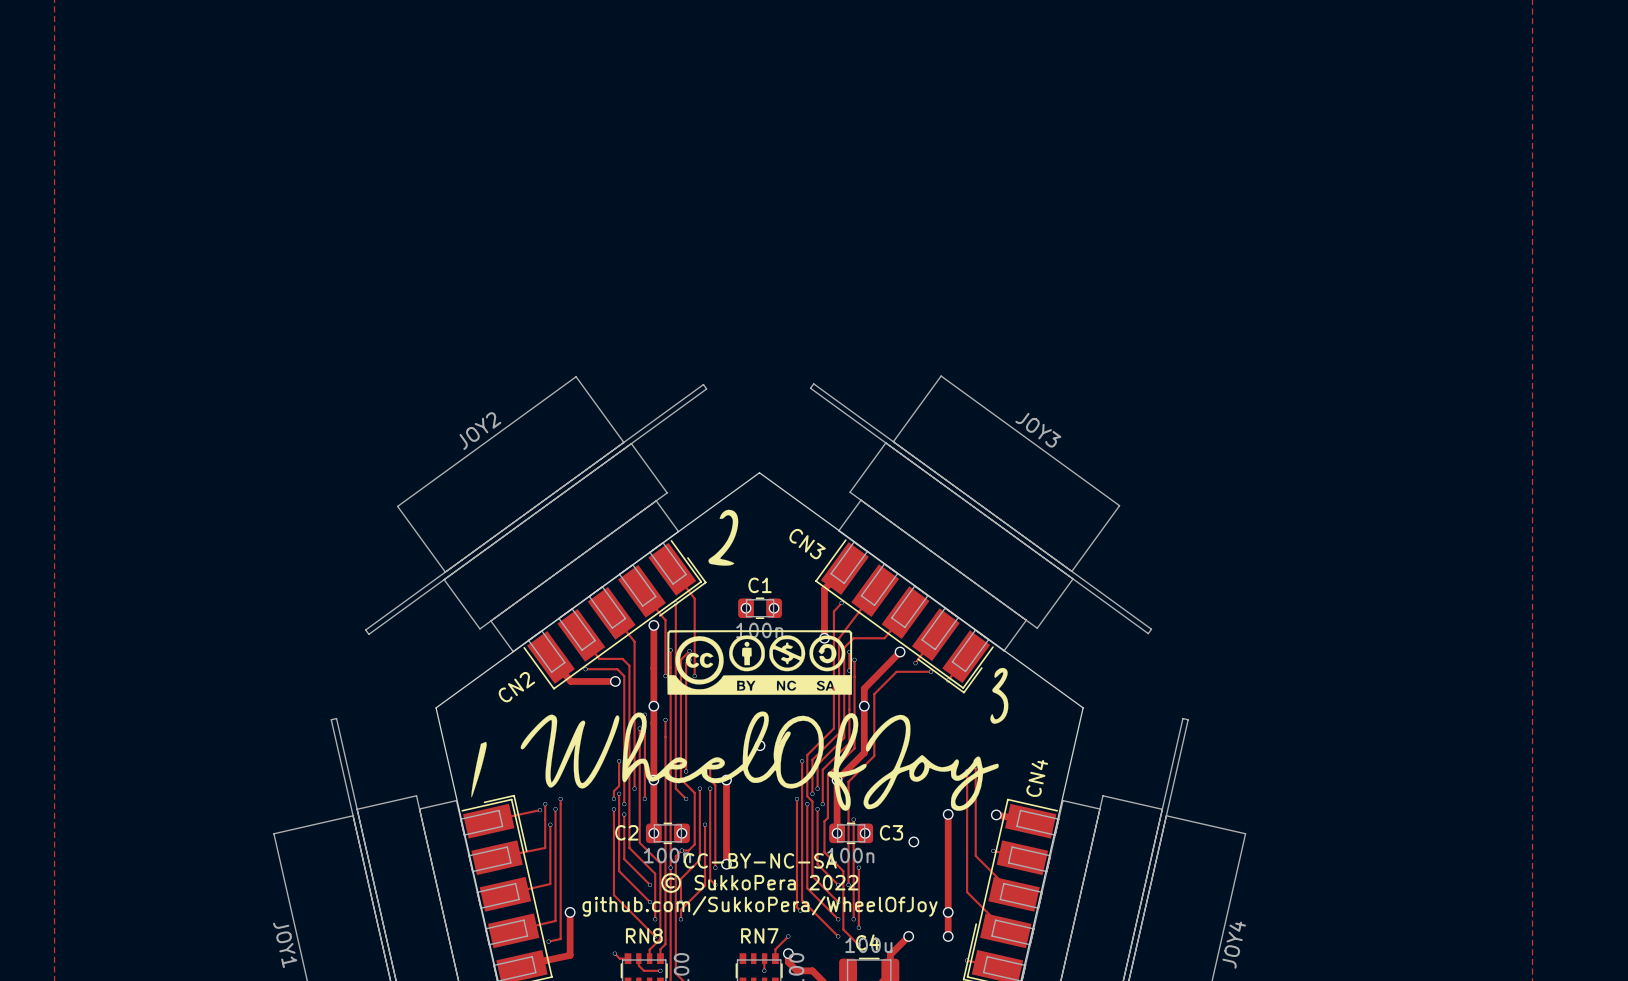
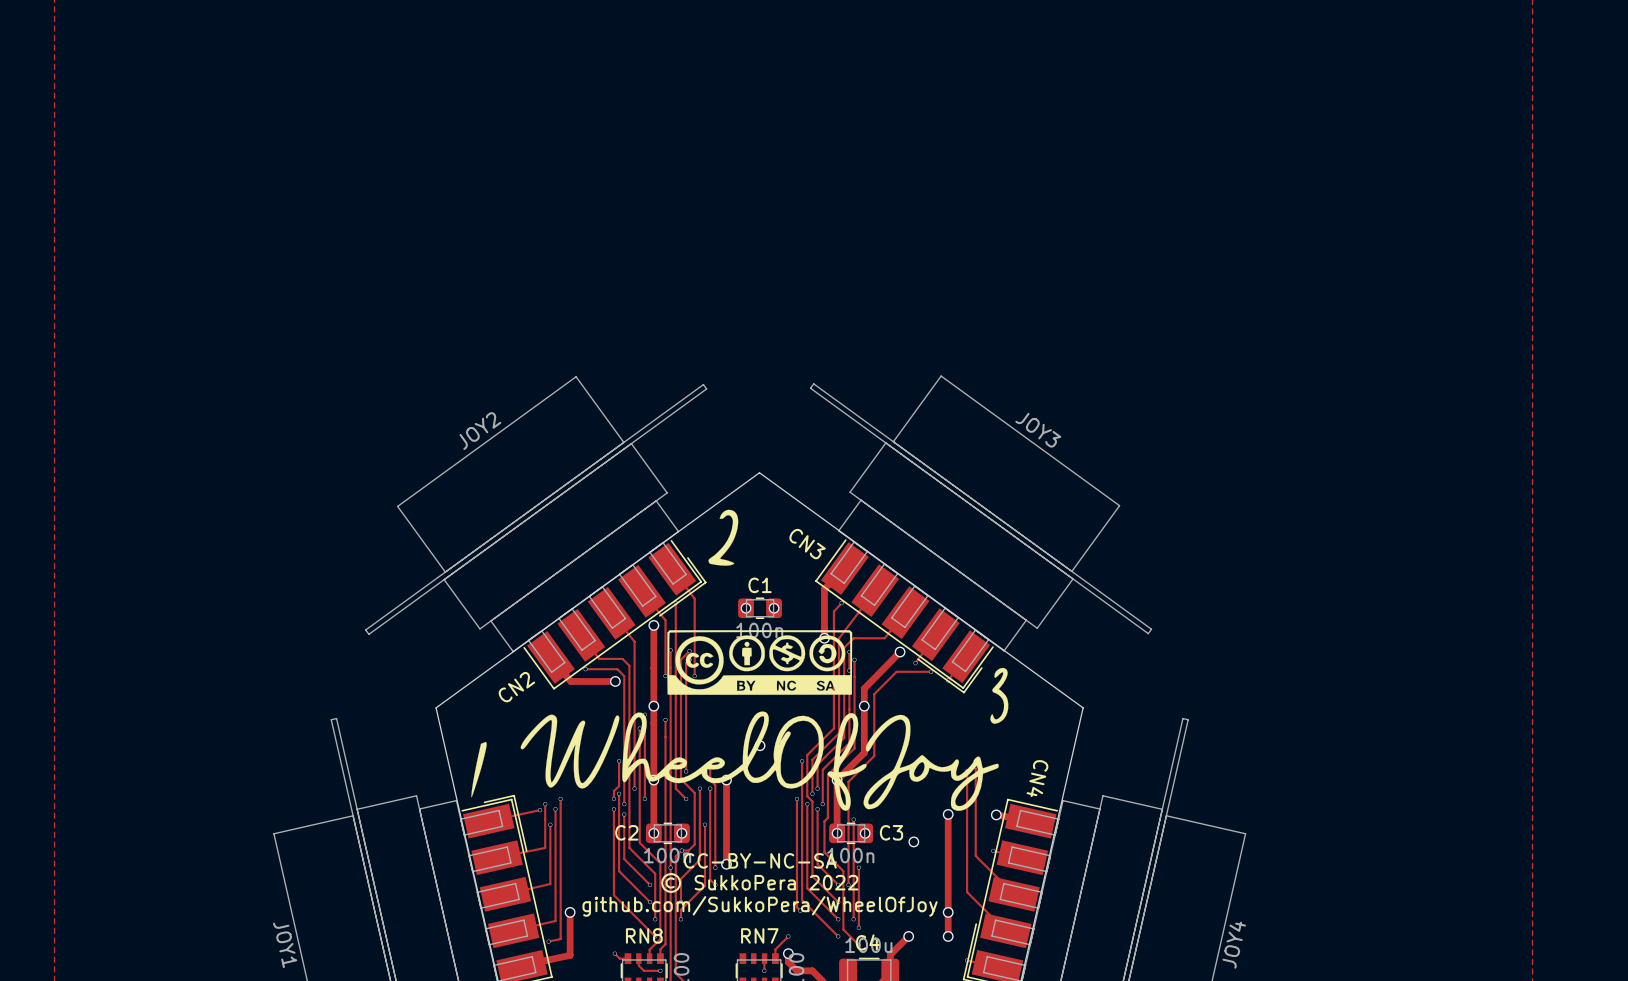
CN4 name rotation: 0° (1037, 778) -> 180° (1037, 778)

